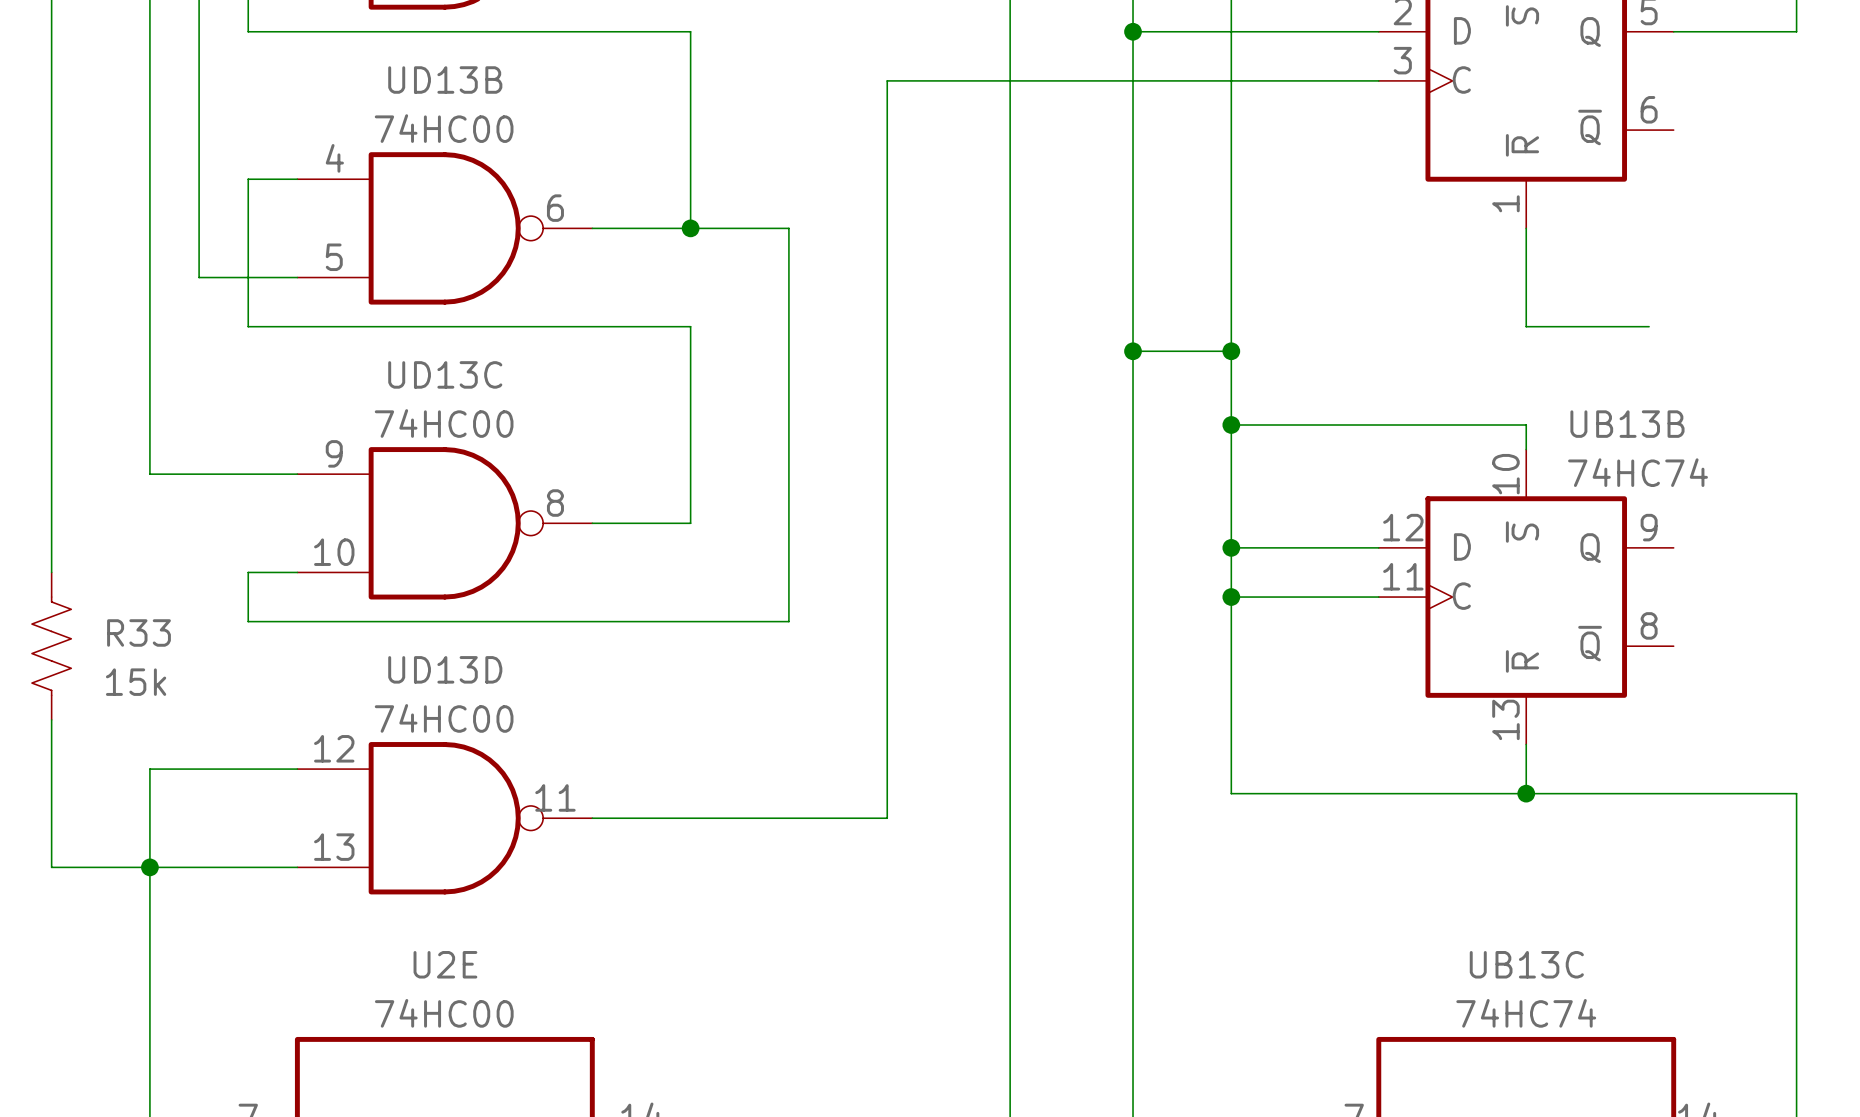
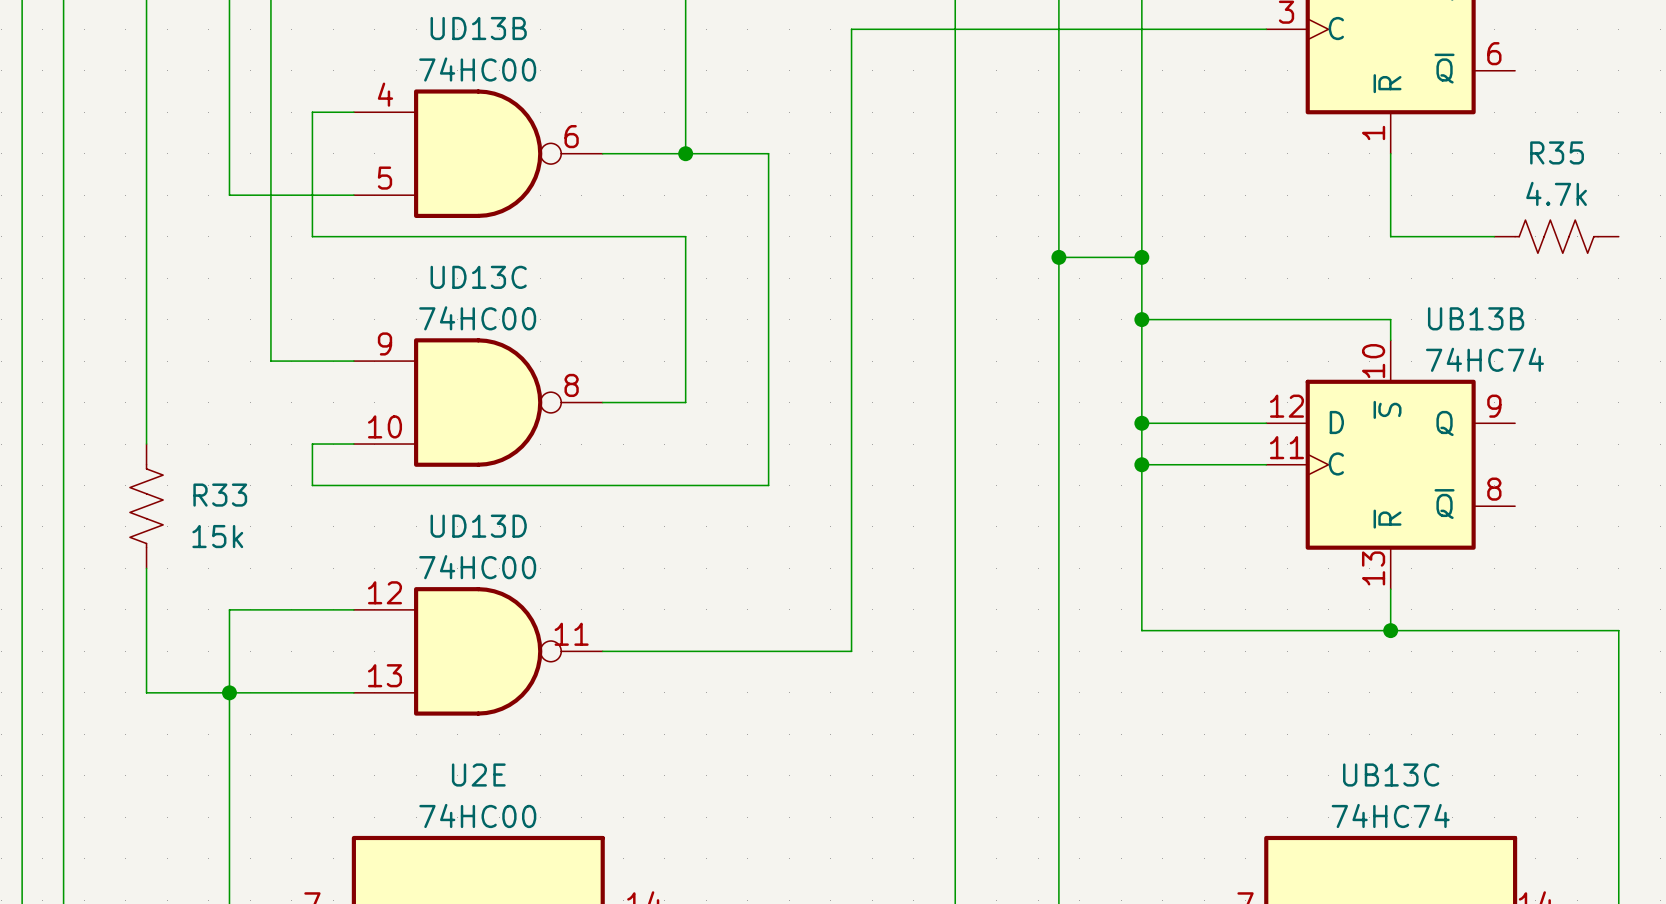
wire: (149, 277) (149, 474) (199, 474) -> (229, 195) (270, 195) (270, 361)
R35: none -> 4.7k (1556, 236)

